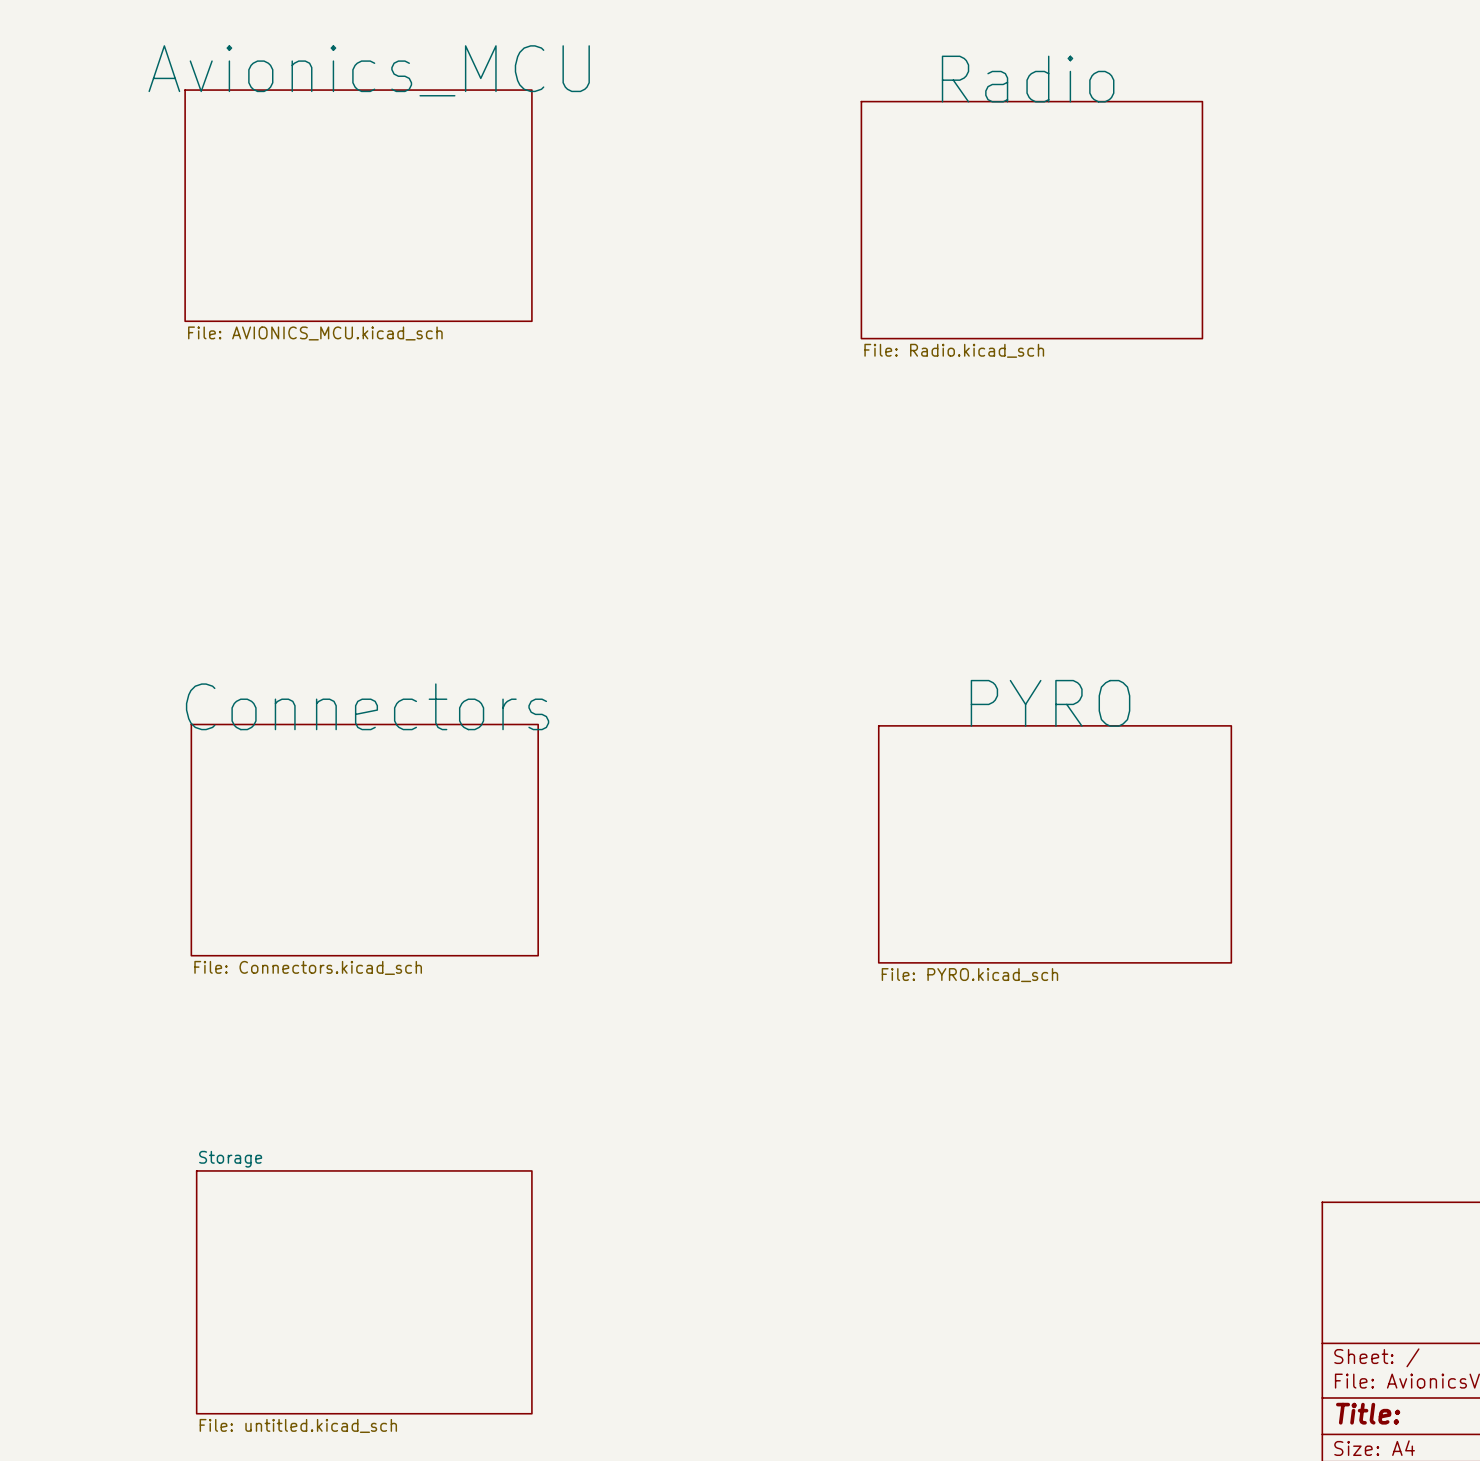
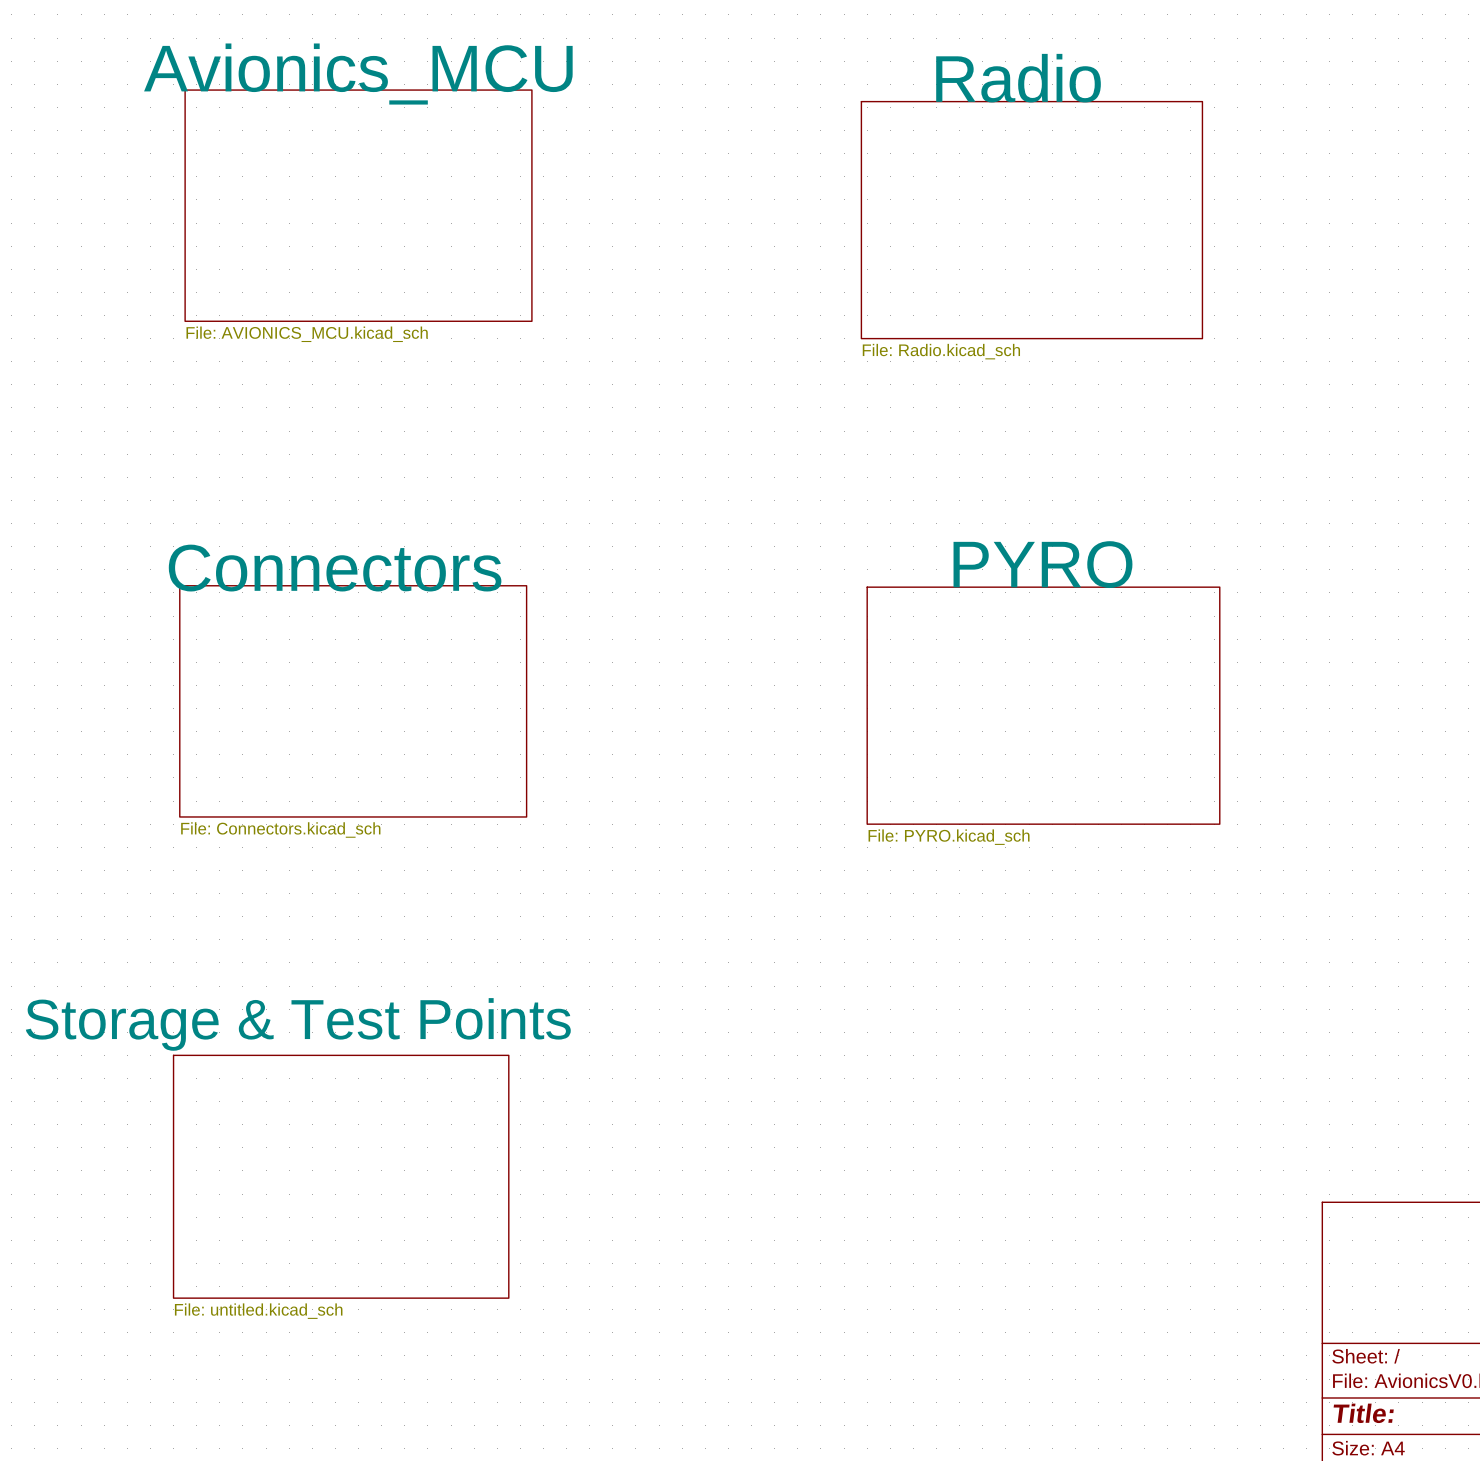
sheet Connectors position: (364, 840) -> (353, 701)
sheet PYRO position: (1055, 844) -> (1043, 705)
sheet Storage & Test Points: none -> File: untitled.kicad_sch (341, 1176)
sheet Storage: File: untitled.kicad_sch (364, 1292) -> none

